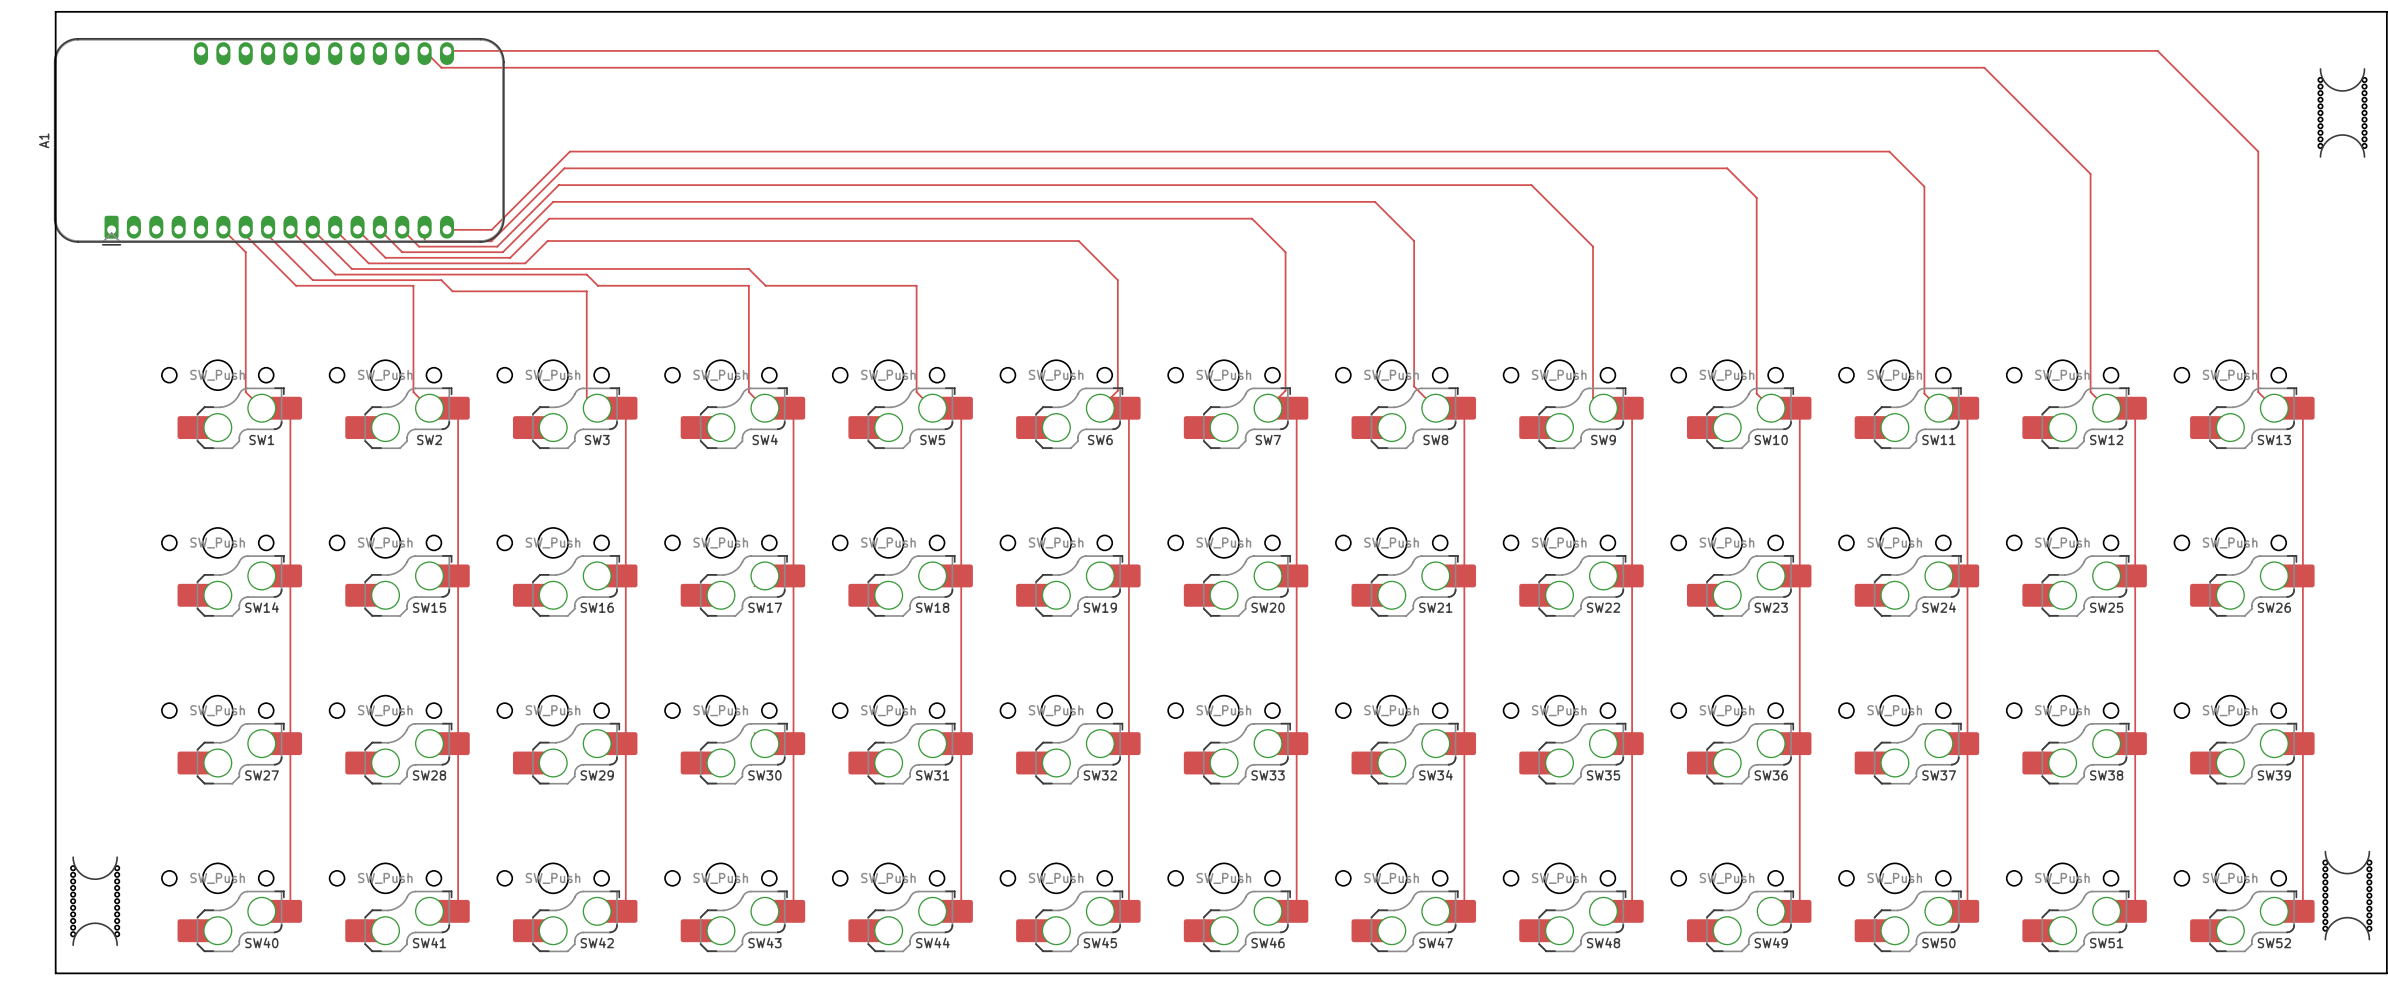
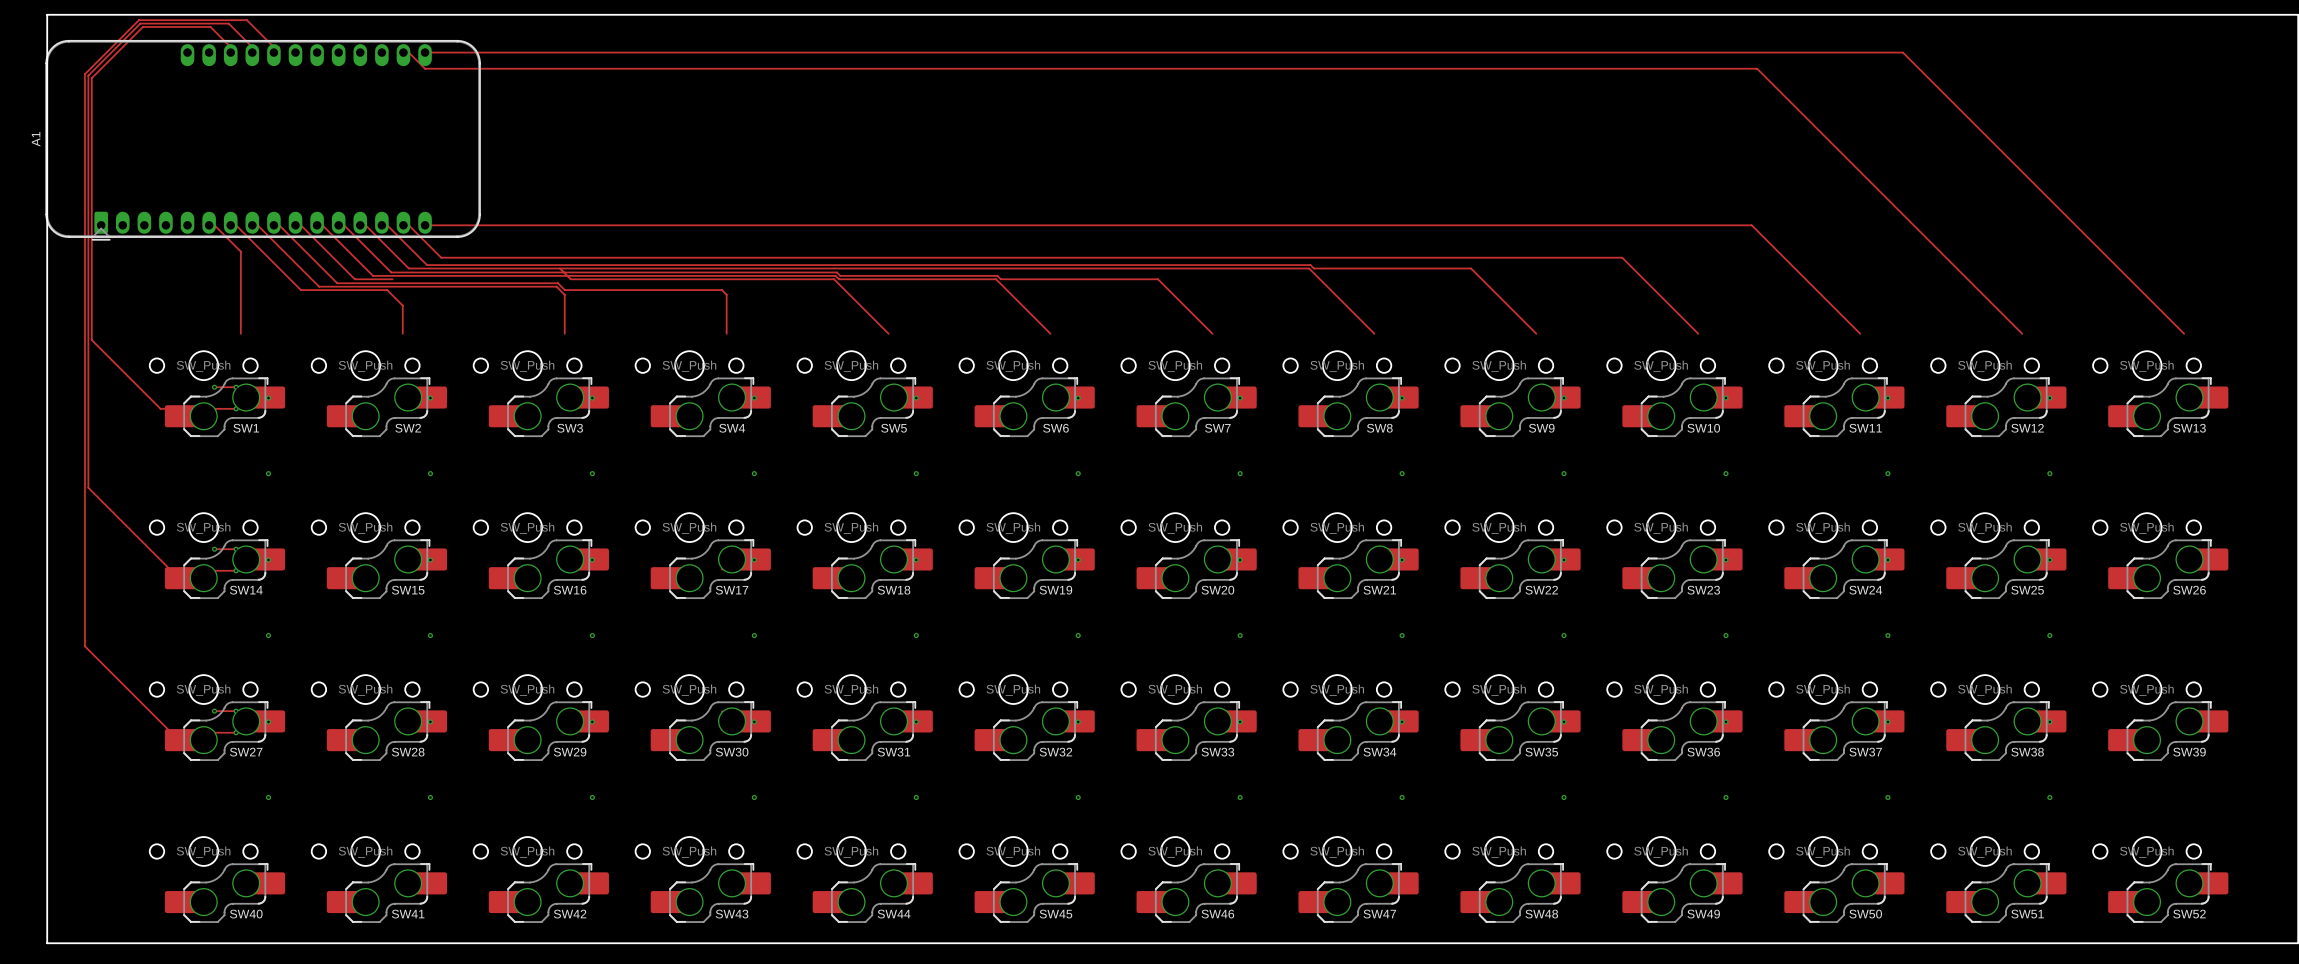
track: none -> (279, 47) (279, 52) (246, 20) (138, 20) (84, 74) (84, 646) (171, 732) (236, 732)
track: none -> (236, 52) (210, 27) (142, 27) (91, 78) (91, 340) (160, 408) (236, 408)
track: none -> (257, 52) (228, 23) (140, 23) (88, 75) (88, 487) (171, 570) (236, 570)
track: (424, 50) (441, 67) (1984, 67) (2090, 173) (2090, 392) (2106, 408) -> none
track: none -> (408, 52) (425, 68) (1757, 68) (2022, 333)
track: (1977, 50) (2157, 50) (2258, 151) (2258, 392) (2274, 408) -> (1902, 52) (2184, 333)
part: (2342, 112) -> none
track: (223, 229) (245, 252) (245, 392) (261, 408) -> none
track: none -> (214, 225) (240, 251) (240, 333)
track: (245, 229) (245, 235) (296, 285) (374, 285) -> (300, 225) (354, 279)
track: none -> (236, 225) (300, 290) (387, 290) (402, 305) (402, 333)
track: (268, 229) (268, 235) (312, 280) (441, 280) (452, 291) (586, 291) (586, 397) (597, 408) -> none
track: none -> (257, 225) (319, 286) (556, 286) (564, 294) (564, 333)
track: (290, 229) (335, 274) (430, 274) -> (365, 225) (408, 268)
track: none -> (279, 225) (337, 283) (558, 283) (564, 290) (721, 290) (726, 294) (726, 333)
track: (312, 229) (351, 268) (748, 268) (765, 285) -> none
track: (335, 229) (368, 263) (463, 263) -> (408, 225) (441, 257)
track: none -> (322, 225) (373, 275) (835, 275) (838, 279)
track: (357, 229) (385, 257) (510, 257) (549, 218) (1252, 218) (1285, 252) (1285, 390) (1268, 408) -> none
track: none -> (344, 225) (391, 272) (836, 272) (840, 275) (997, 275) (1000, 279) (1158, 279) (1212, 333)
track: (379, 229) (402, 252) (502, 252) (553, 201) (1375, 201) (1414, 241) (1414, 386) (1435, 408) -> none
track: (402, 229) (419, 246) (497, 246) (558, 185) (1531, 185) (1593, 246) (1593, 397) (1603, 408) -> none
track: none -> (387, 225) (427, 265) (1310, 265) (1313, 268) (1471, 268) (1536, 333)
track: (424, 229) (424, 241) (491, 241) (564, 168) (1727, 168) (1756, 197) (1756, 393) (1771, 408) -> none
track: (491, 229) (569, 151) (1889, 151) (1924, 186) (1924, 393) (1938, 408) -> (468, 225) (1751, 225) (1860, 333)
track: (525, 263) (547, 241) (1078, 241) (1117, 280) (1117, 390) (1100, 408) -> (500, 257) (1622, 257) (1698, 333)
track: none -> (560, 268) (1309, 268) (1374, 333)
track: (413, 285) (413, 392) (429, 408) -> none
track: (748, 285) (748, 392) (764, 408) -> (716, 279) (732, 279)
track: (870, 285) (875, 285) -> (834, 279) (888, 333)
track: (916, 285) (916, 392) (932, 408) -> (878, 279) (996, 279) (1050, 333)
track: none -> (214, 387) (236, 387)
via: none -> (214, 387)
via: none -> (236, 387)
via: none -> (268, 398)
track: (290, 408) (290, 911) -> none
via: none -> (430, 398)
track: (458, 408) (458, 911) -> none
via: none -> (592, 398)
track: (625, 408) (625, 911) -> none
via: none -> (754, 398)
track: (793, 408) (793, 911) -> none
via: none -> (916, 398)
track: (961, 408) (961, 911) -> none
via: none -> (1078, 398)
track: (1128, 408) (1128, 911) -> none
via: none -> (1240, 398)
track: (1296, 408) (1296, 911) -> none
via: none -> (1402, 398)
track: (1464, 408) (1464, 907) -> none
via: none -> (1564, 398)
track: (1632, 408) (1632, 911) -> none
via: none -> (1725, 398)
track: (1799, 408) (1799, 911) -> none
via: none -> (1887, 398)
track: (1967, 408) (1967, 911) -> none
via: none -> (2049, 398)
track: (2135, 408) (2135, 911) -> none
track: (2302, 408) (2302, 911) -> none
via: none -> (236, 408)
via: none -> (268, 473)
via: none -> (430, 473)
via: none -> (592, 473)
via: none -> (754, 473)
via: none -> (916, 473)
via: none -> (1078, 473)
via: none -> (1240, 473)
via: none -> (1402, 473)
via: none -> (1564, 473)
via: none -> (1725, 473)
via: none -> (1887, 473)
via: none -> (2049, 473)
track: none -> (214, 549) (236, 549)
via: none -> (214, 549)
via: none -> (236, 549)
via: none -> (268, 559)
via: none -> (430, 559)
via: none -> (592, 559)
via: none -> (754, 559)
via: none -> (916, 559)
via: none -> (1078, 559)
via: none -> (1240, 559)
via: none -> (1402, 559)
via: none -> (1564, 559)
via: none -> (1725, 559)
via: none -> (1887, 559)
via: none -> (2049, 559)
via: none -> (236, 570)
via: none -> (268, 635)
via: none -> (430, 635)
via: none -> (592, 635)
via: none -> (754, 635)
via: none -> (916, 635)
via: none -> (1078, 635)
via: none -> (1240, 635)
via: none -> (1402, 635)
via: none -> (1564, 635)
via: none -> (1725, 635)
via: none -> (1887, 635)
via: none -> (2049, 635)
track: none -> (214, 711) (236, 711)
via: none -> (214, 711)
via: none -> (236, 711)
via: none -> (268, 721)
via: none -> (430, 721)
via: none -> (592, 721)
via: none -> (754, 721)
via: none -> (916, 721)
via: none -> (1078, 721)
via: none -> (1240, 721)
via: none -> (1402, 721)
via: none -> (1564, 721)
via: none -> (1725, 721)
via: none -> (1887, 721)
via: none -> (2049, 721)
via: none -> (236, 732)
via: none -> (268, 797)
via: none -> (430, 797)
via: none -> (592, 797)
via: none -> (754, 797)
via: none -> (916, 797)
via: none -> (1078, 797)
via: none -> (1240, 797)
via: none -> (1402, 797)
via: none -> (1564, 797)
via: none -> (1725, 797)
via: none -> (1887, 797)
via: none -> (2049, 797)
part: (2347, 895) -> none
part: (95, 901) -> none

